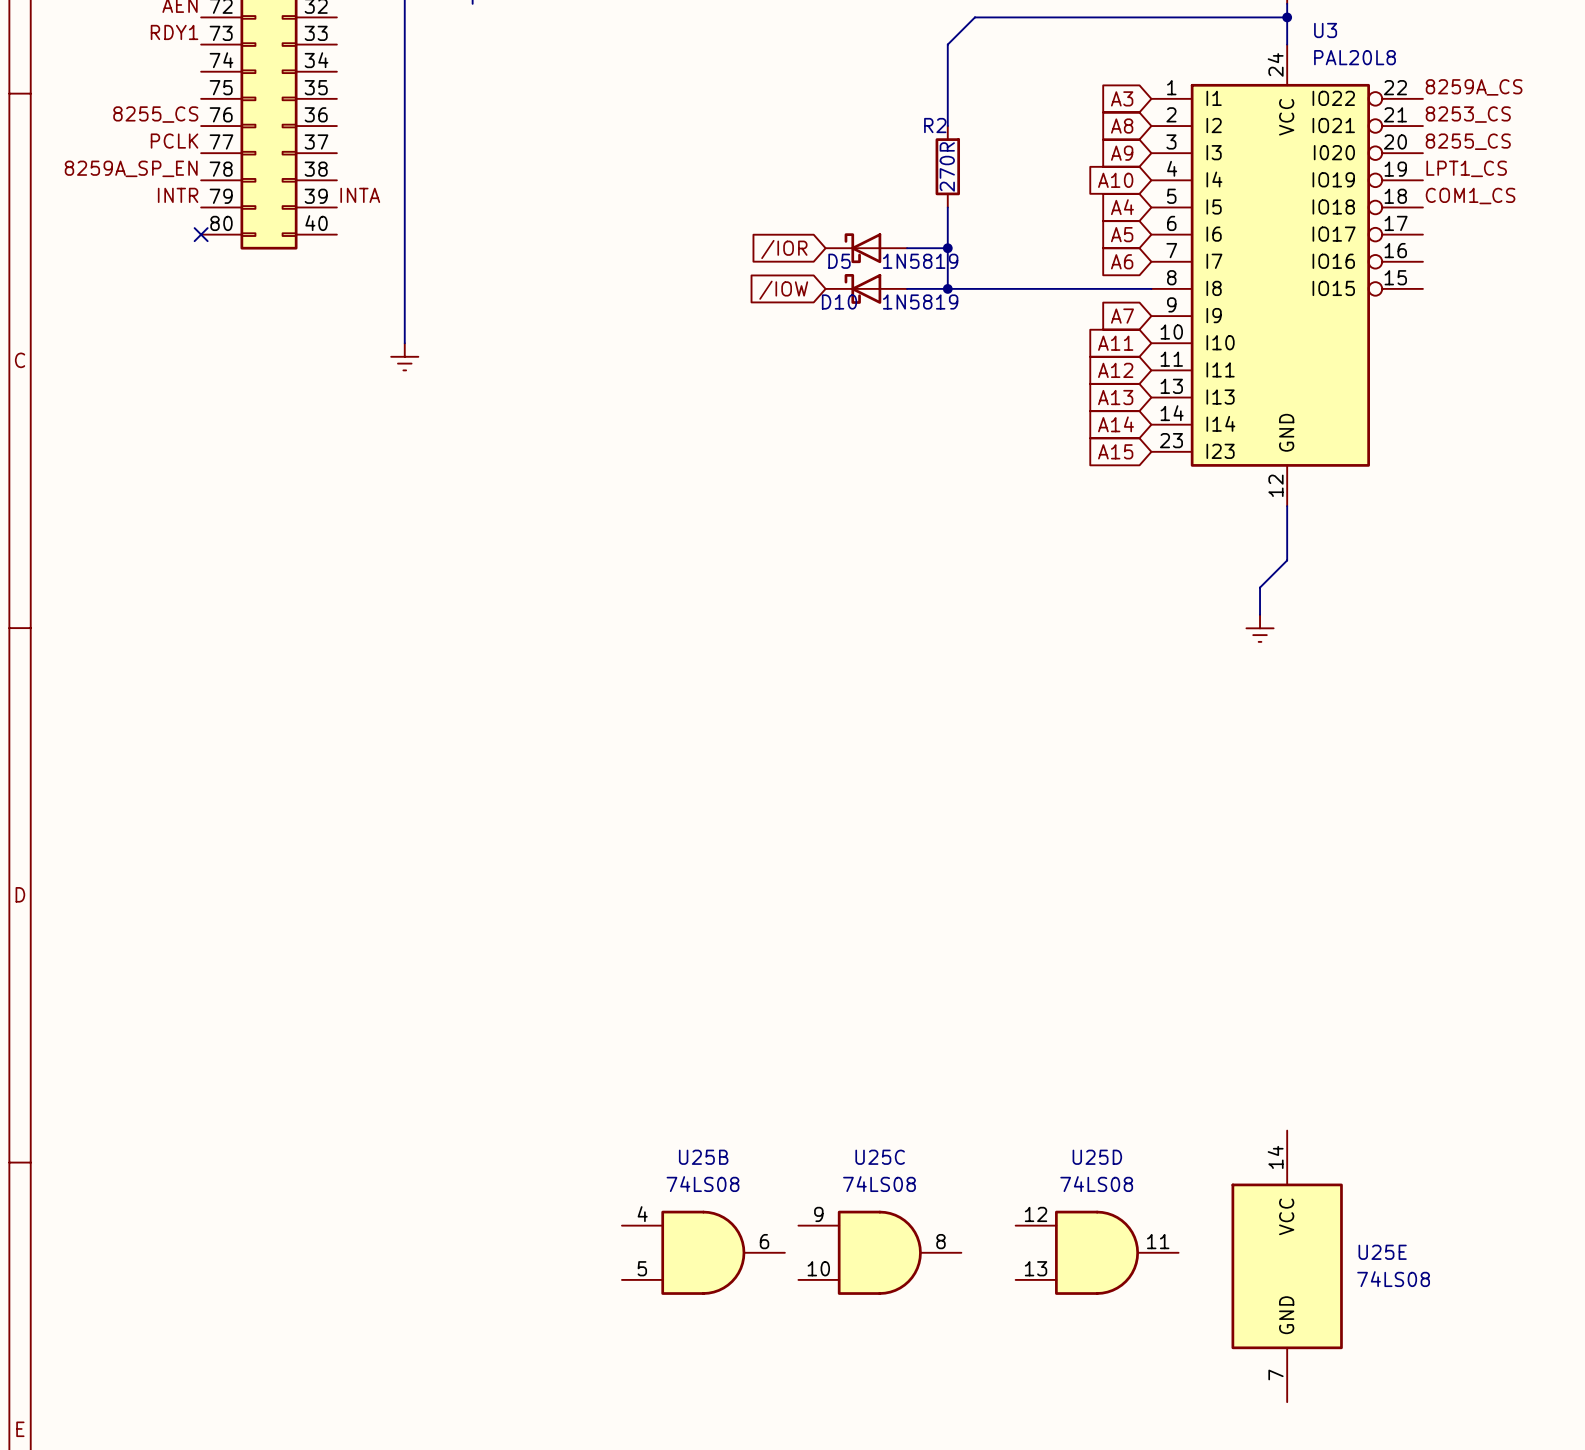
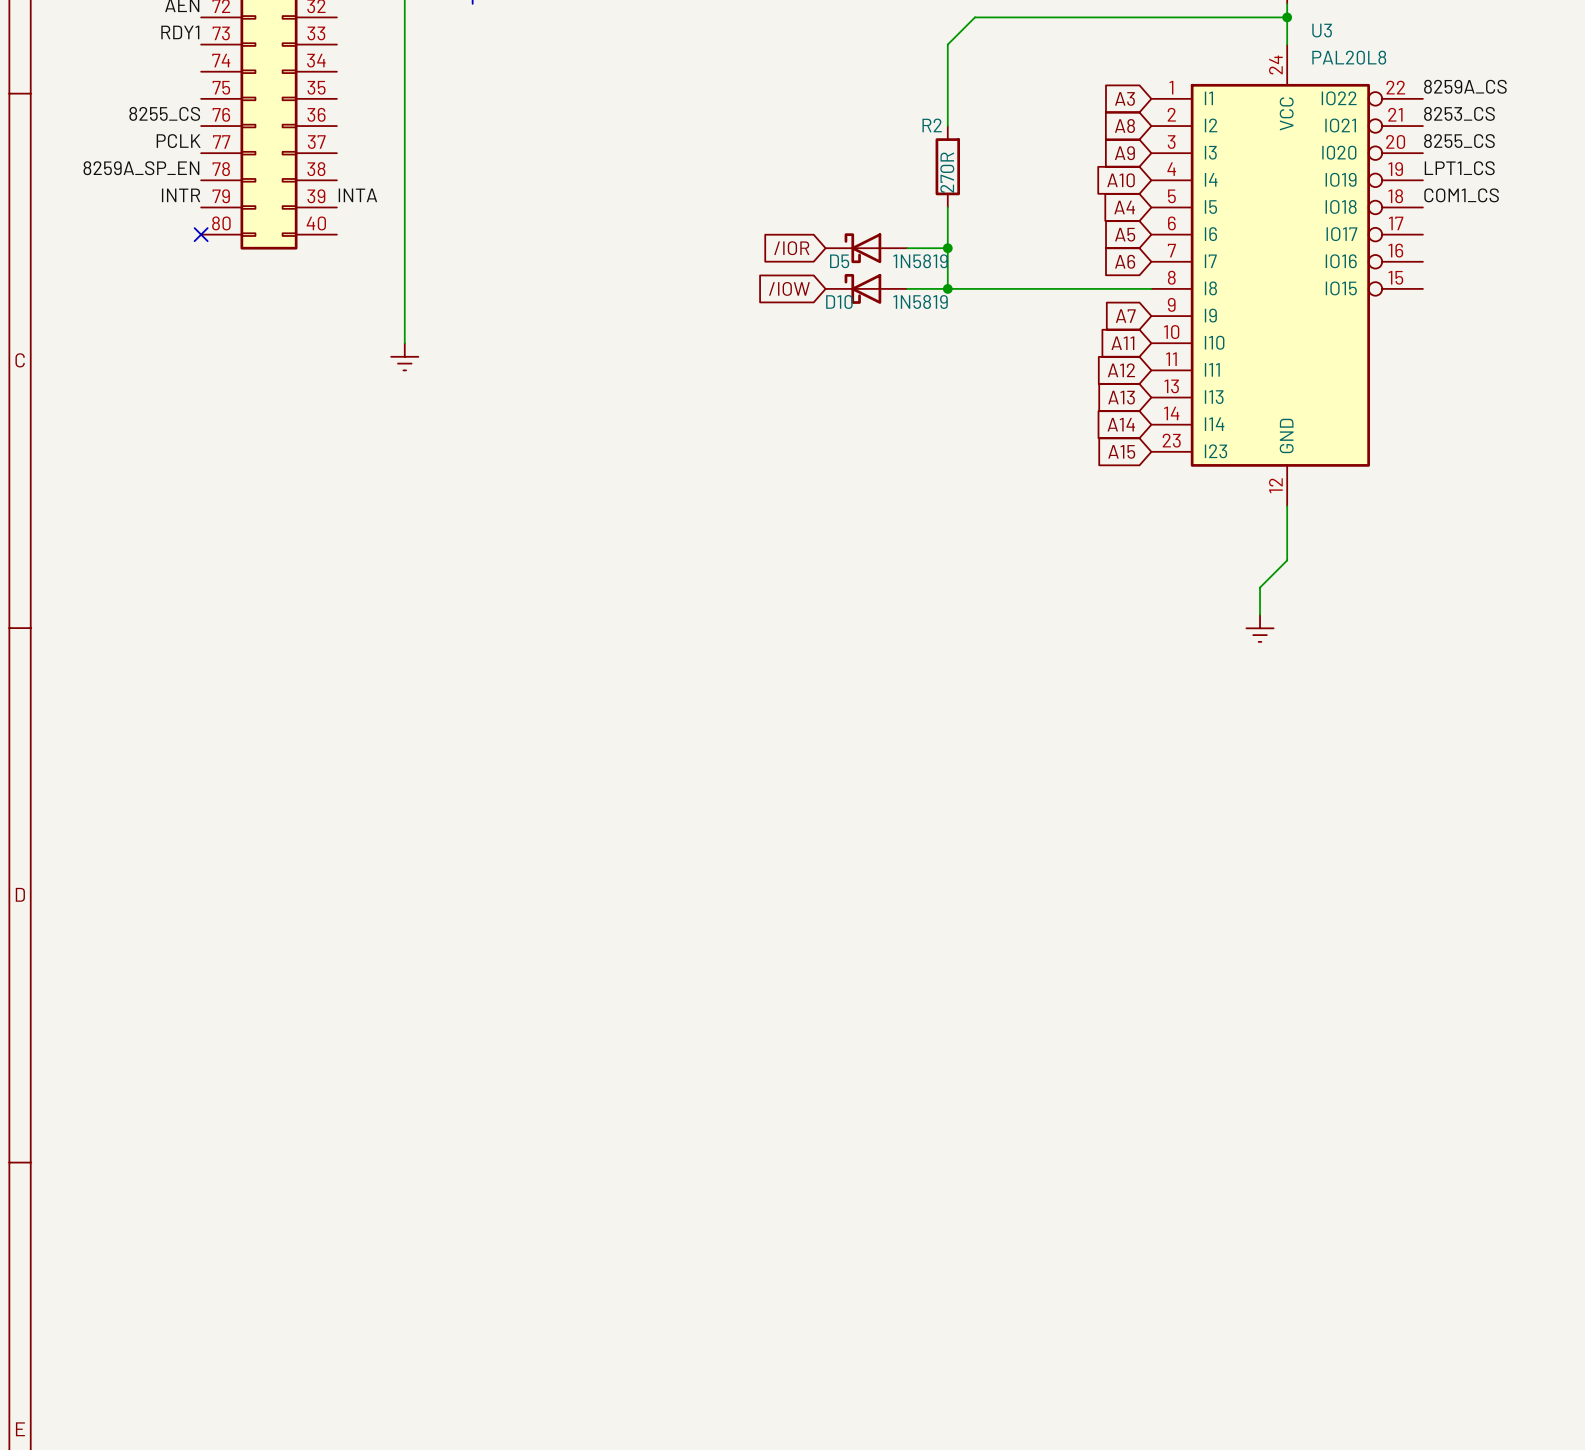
U25B: 74LS08 (703, 1252) -> none
U25C: 74LS08 (879, 1252) -> none
U25D: 74LS08 (1097, 1252) -> none
U25E: 74LS08 (1287, 1266) -> none

